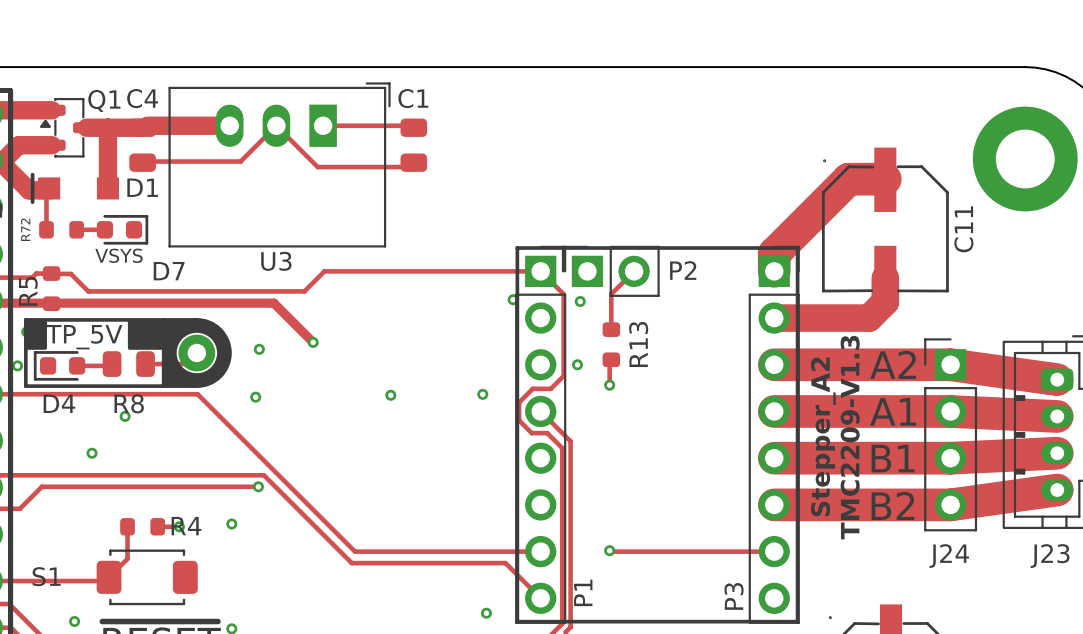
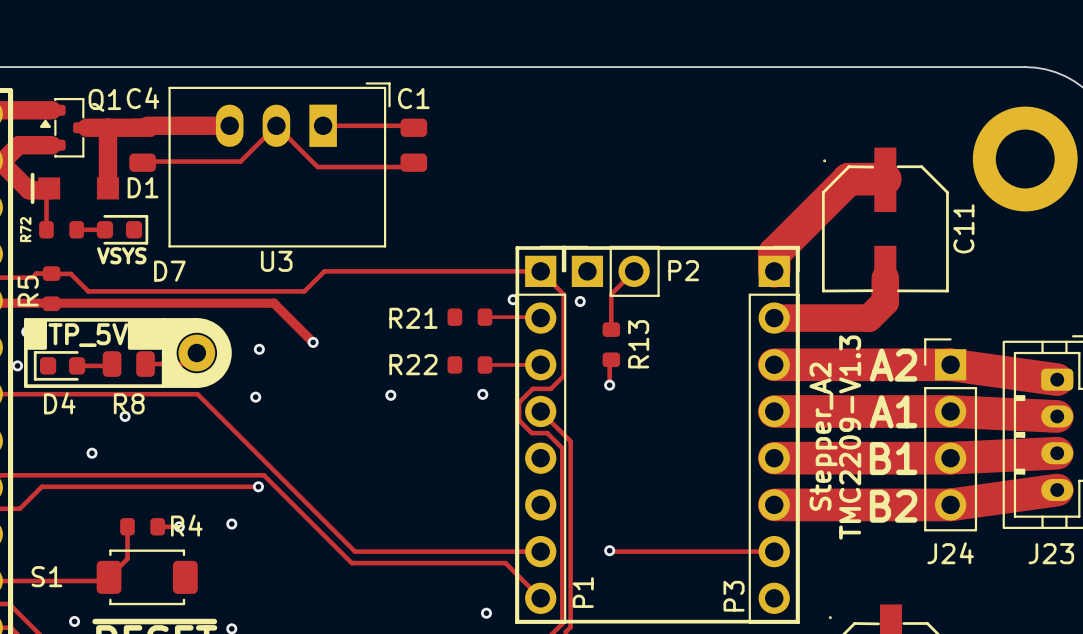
R21: none -> (469, 317)
track: none -> (484, 317) (540, 318)
R22: none -> (469, 364)
track: none -> (484, 364) (540, 364)
via: (577, 364) -> none

